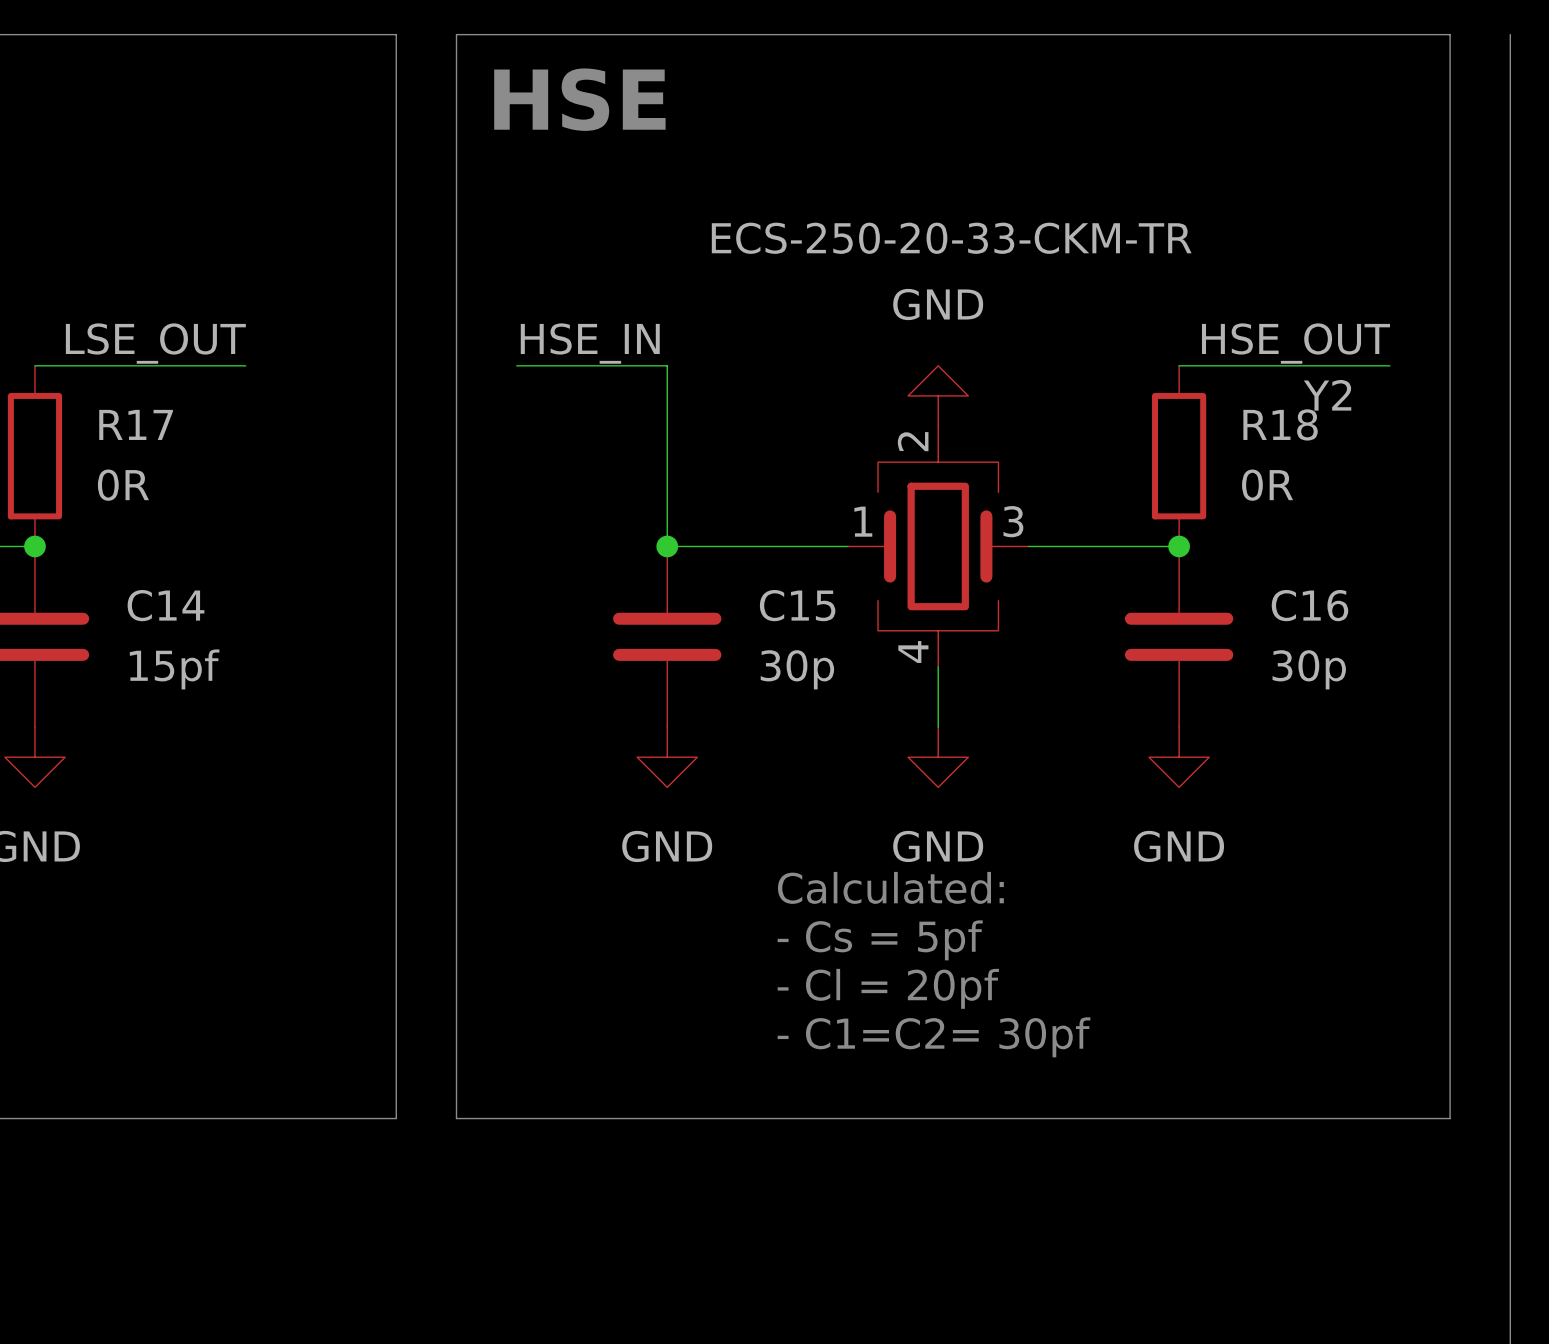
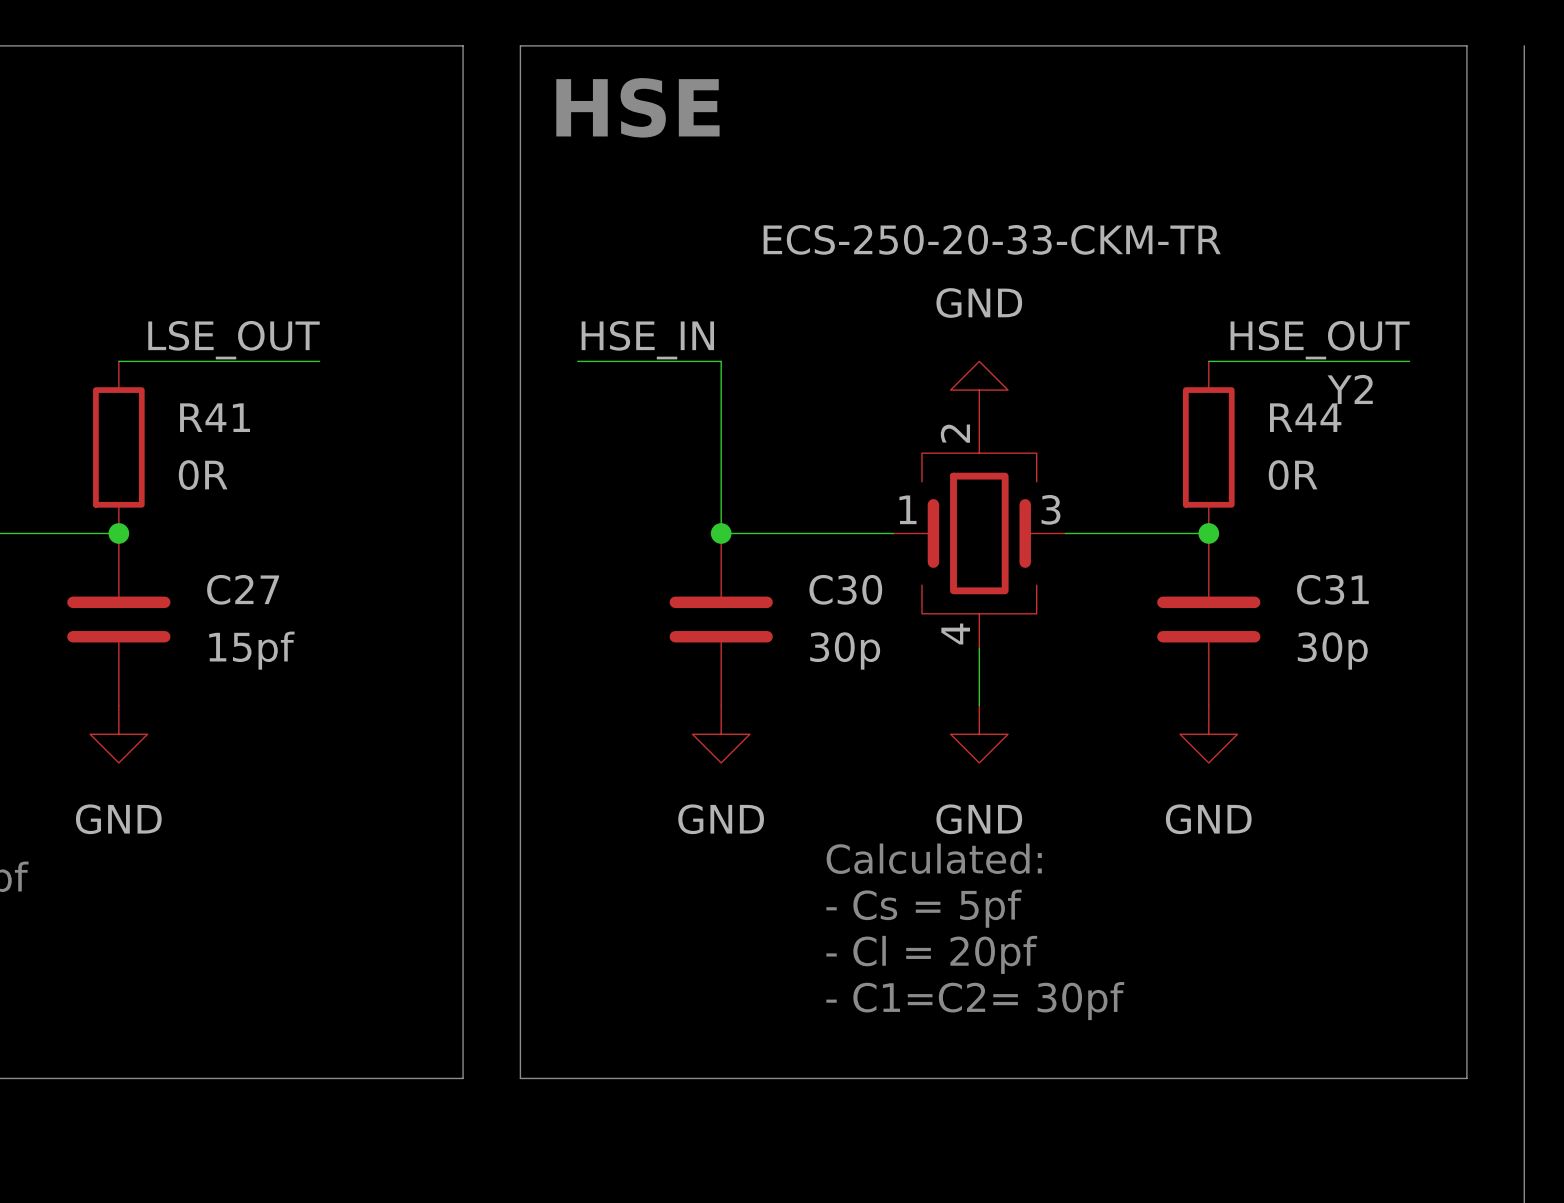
R17 name: R17 (136, 424) -> R41 (215, 417)
R18 name: R18 (1280, 424) -> R44 (1305, 417)
C14 name: C14 (165, 605) -> C27 (243, 589)
C15 name: C15 (797, 605) -> C30 (845, 589)
C16 name: C16 (1309, 605) -> C31 (1332, 589)

